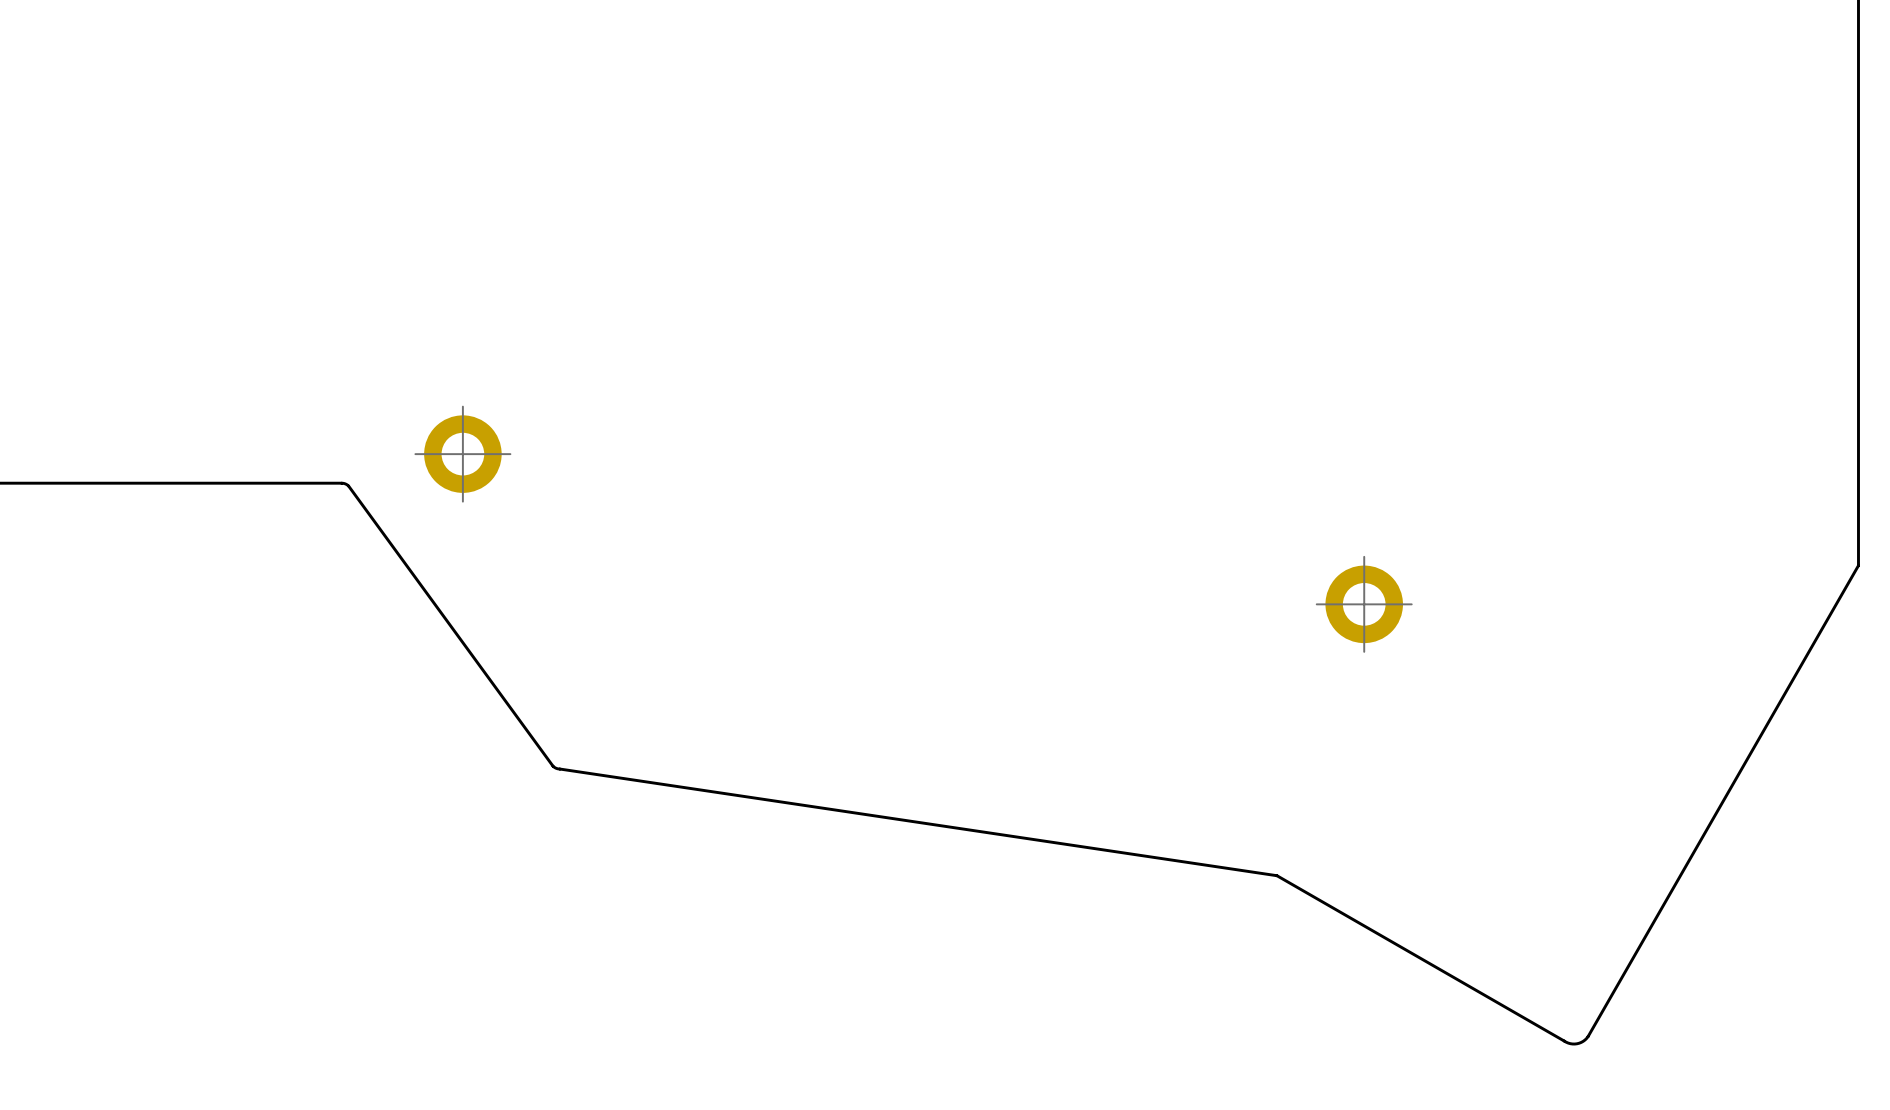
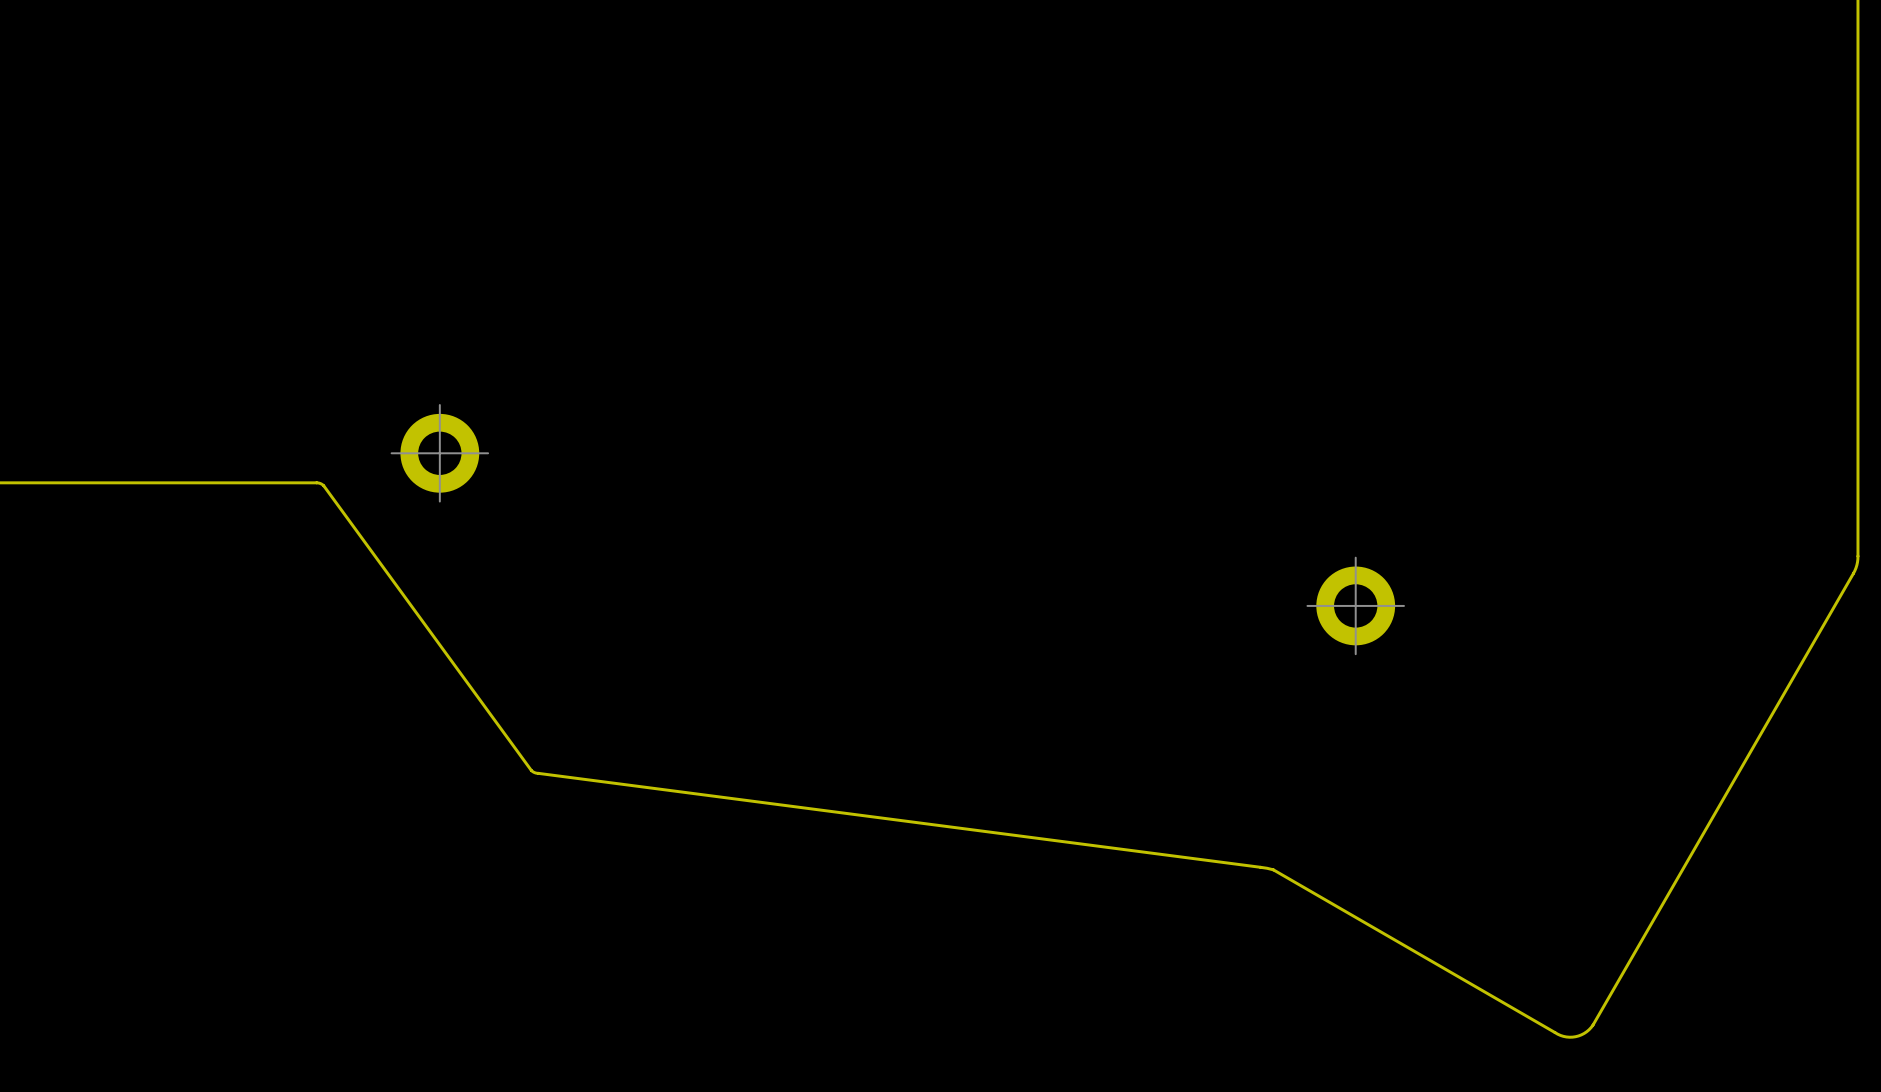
board edge: (348, 486) (556, 768) (1276, 875) (1566, 1042) (1572, 1044) (1581, 1042) (1588, 1036) (1858, 565) (1858, 555) -> (323, 485) (534, 772) (1273, 869) (1557, 1034) (1569, 1037) (1581, 1034) (1593, 1025) (1853, 573) (1857, 556)

